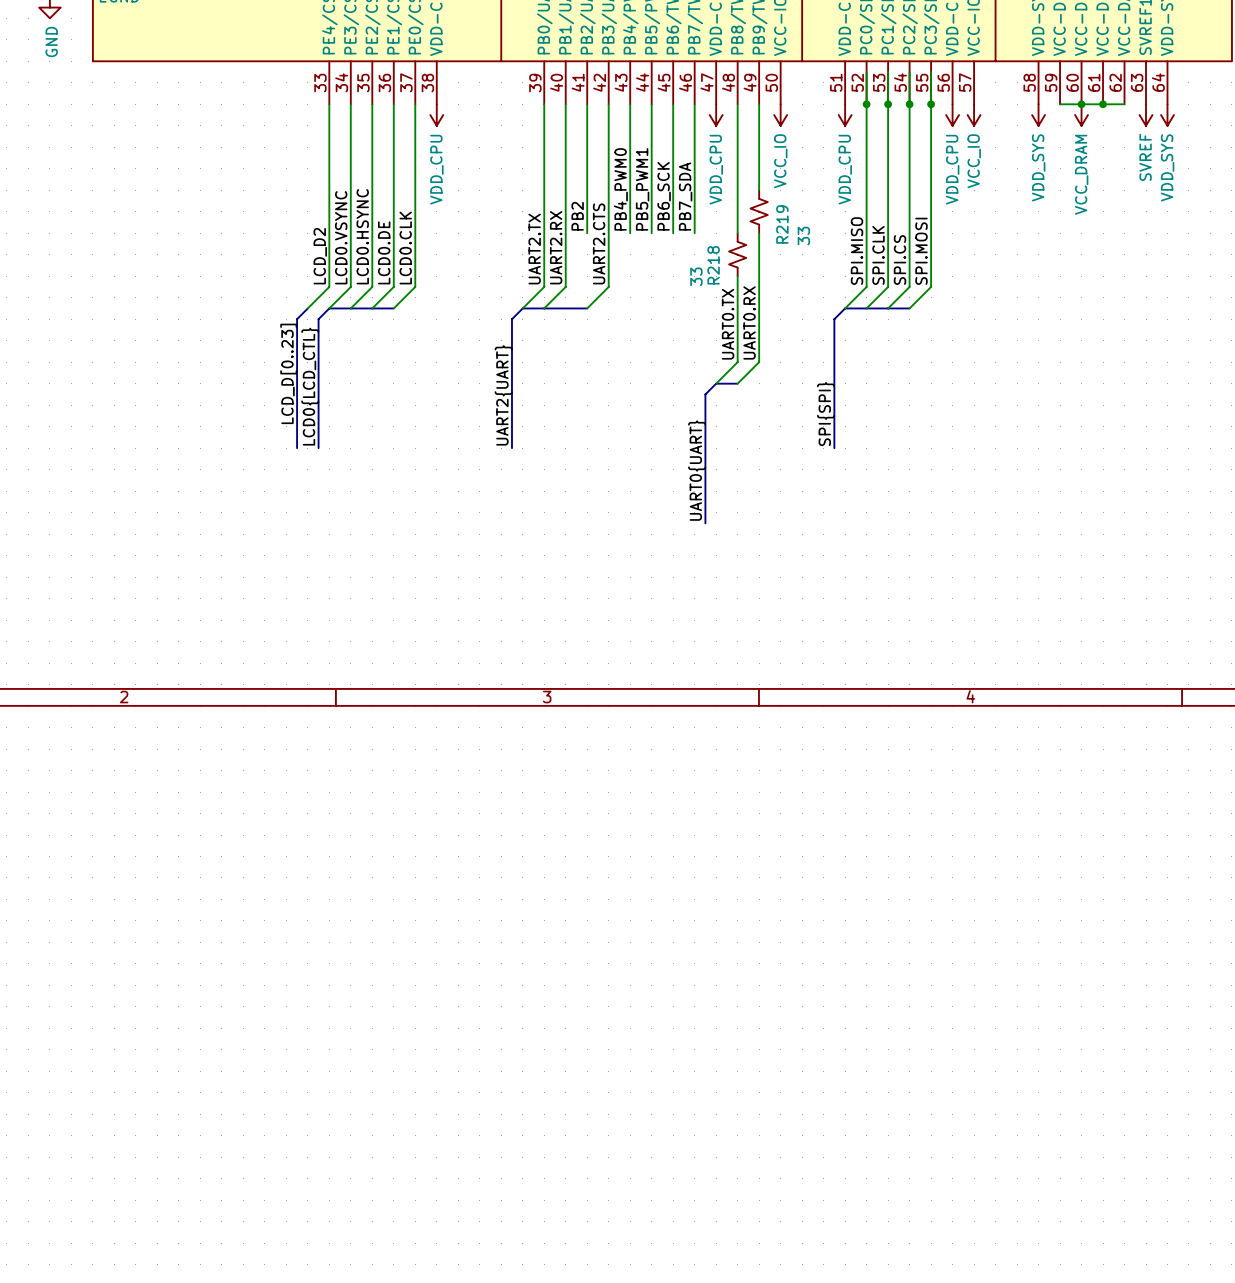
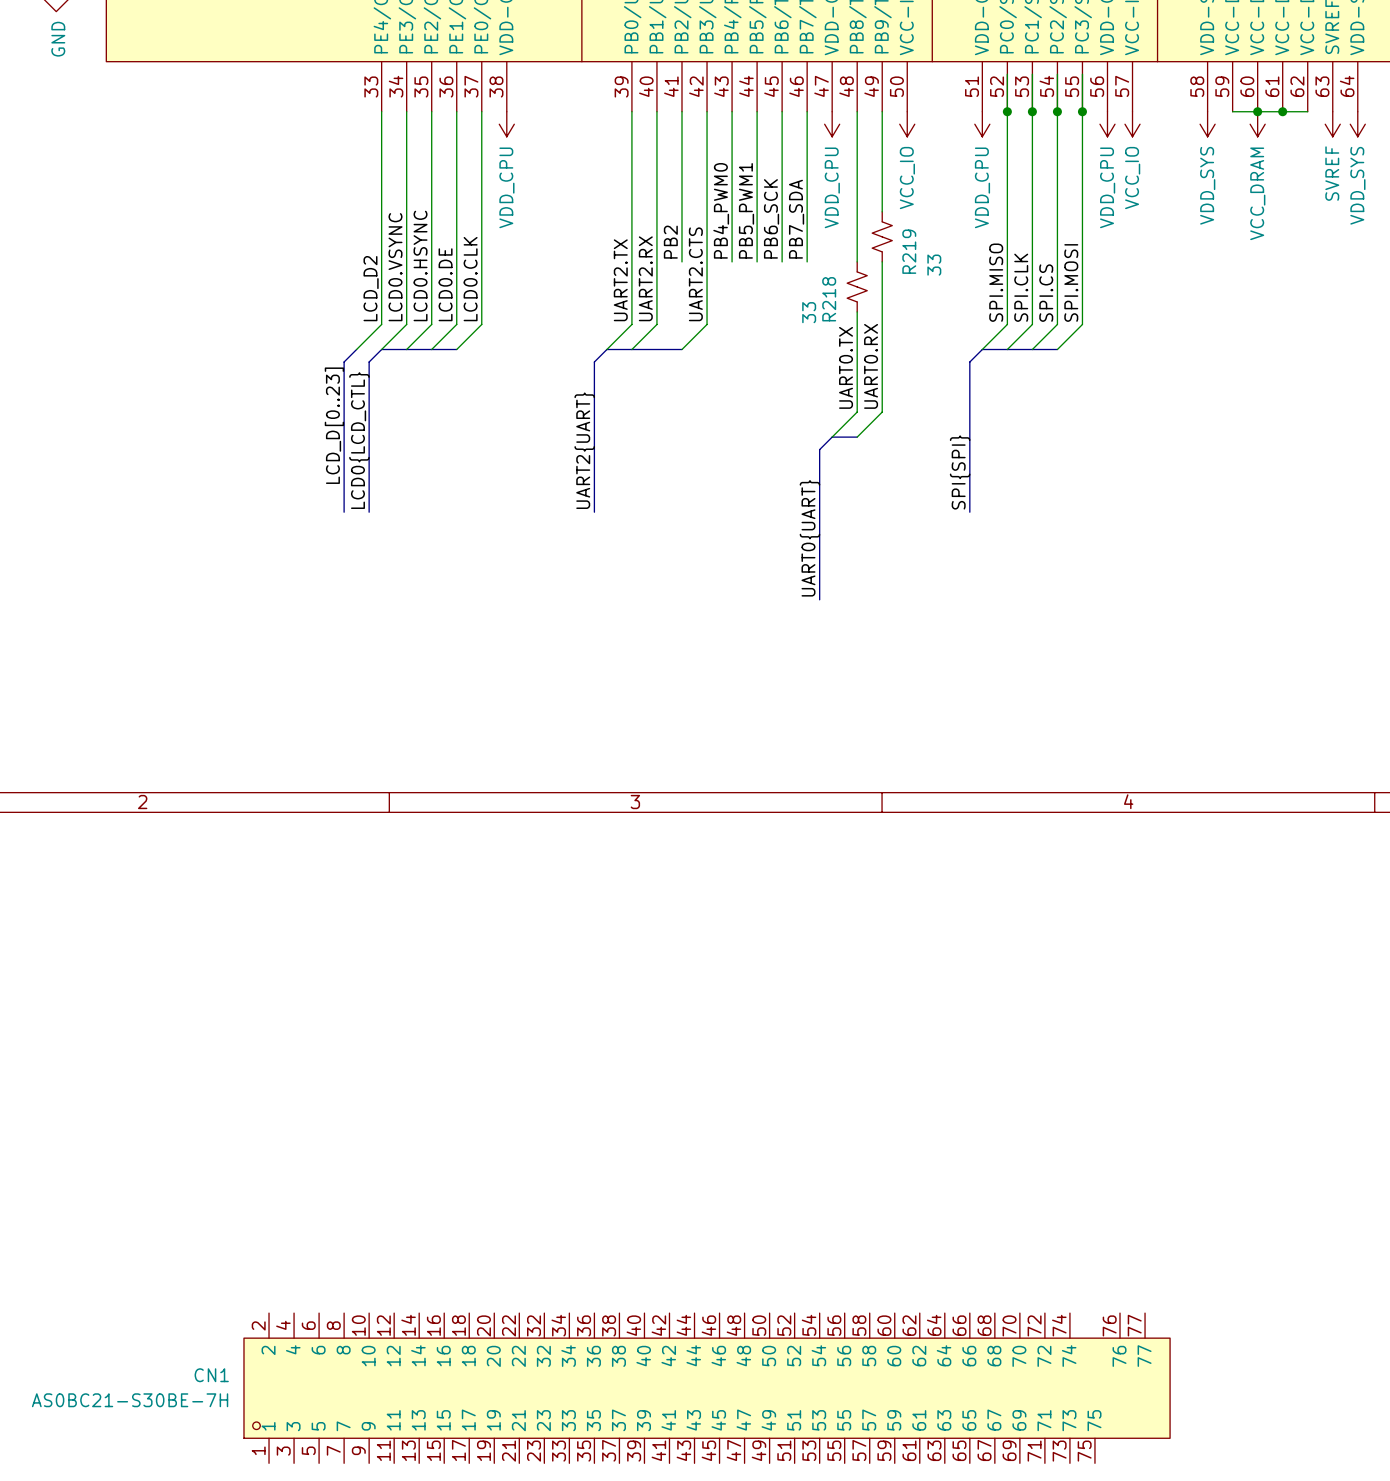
CN1: none -> AS0BC21-S30BE-7H (707, 1388)

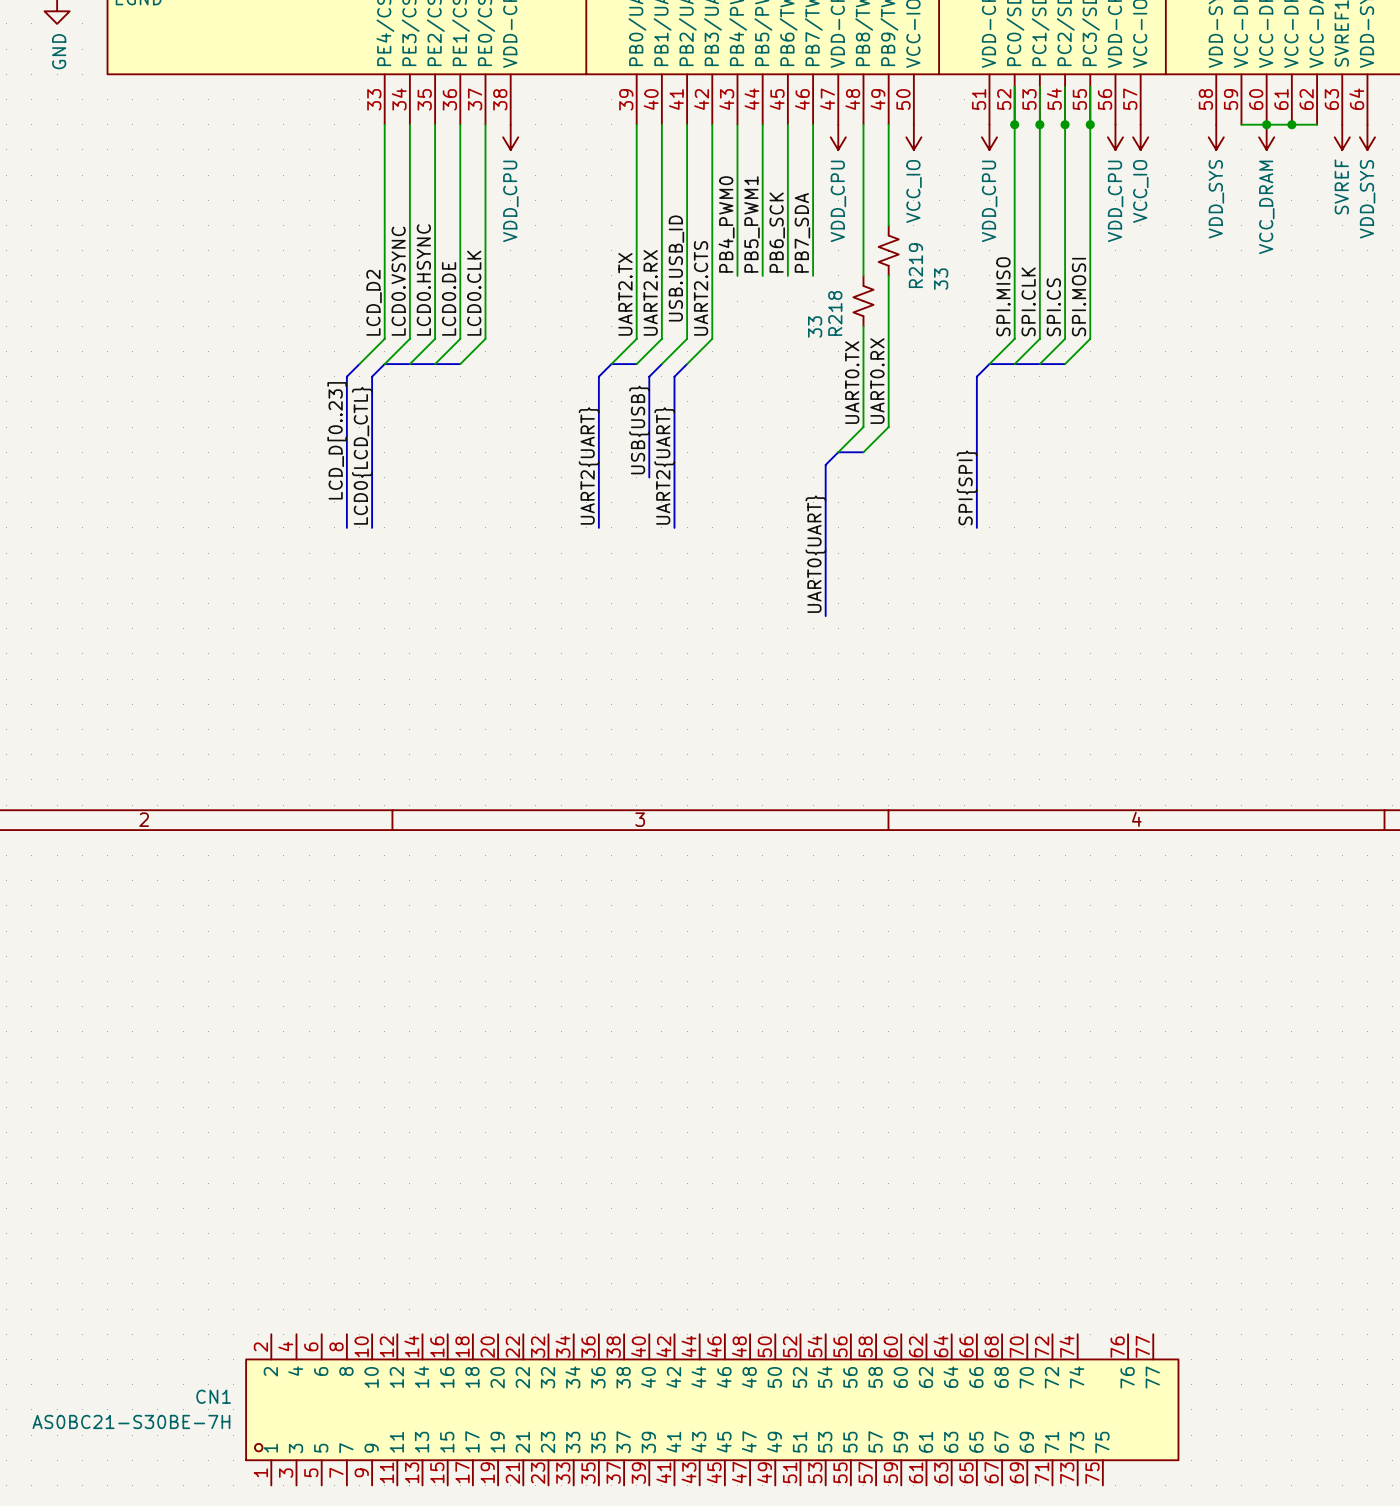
label: PB2 (670, 242) -> none
label: none -> USB.USB_ID (676, 268)
wire: none -> (687, 275) (687, 338) (661, 364)
bus: (631, 349) (681, 349) -> (674, 527) (674, 376) (687, 364)
bus: none -> (661, 364) (649, 376) (649, 477)
label: none -> USB{USB} (639, 429)
label: none -> UART2{UART} (664, 465)

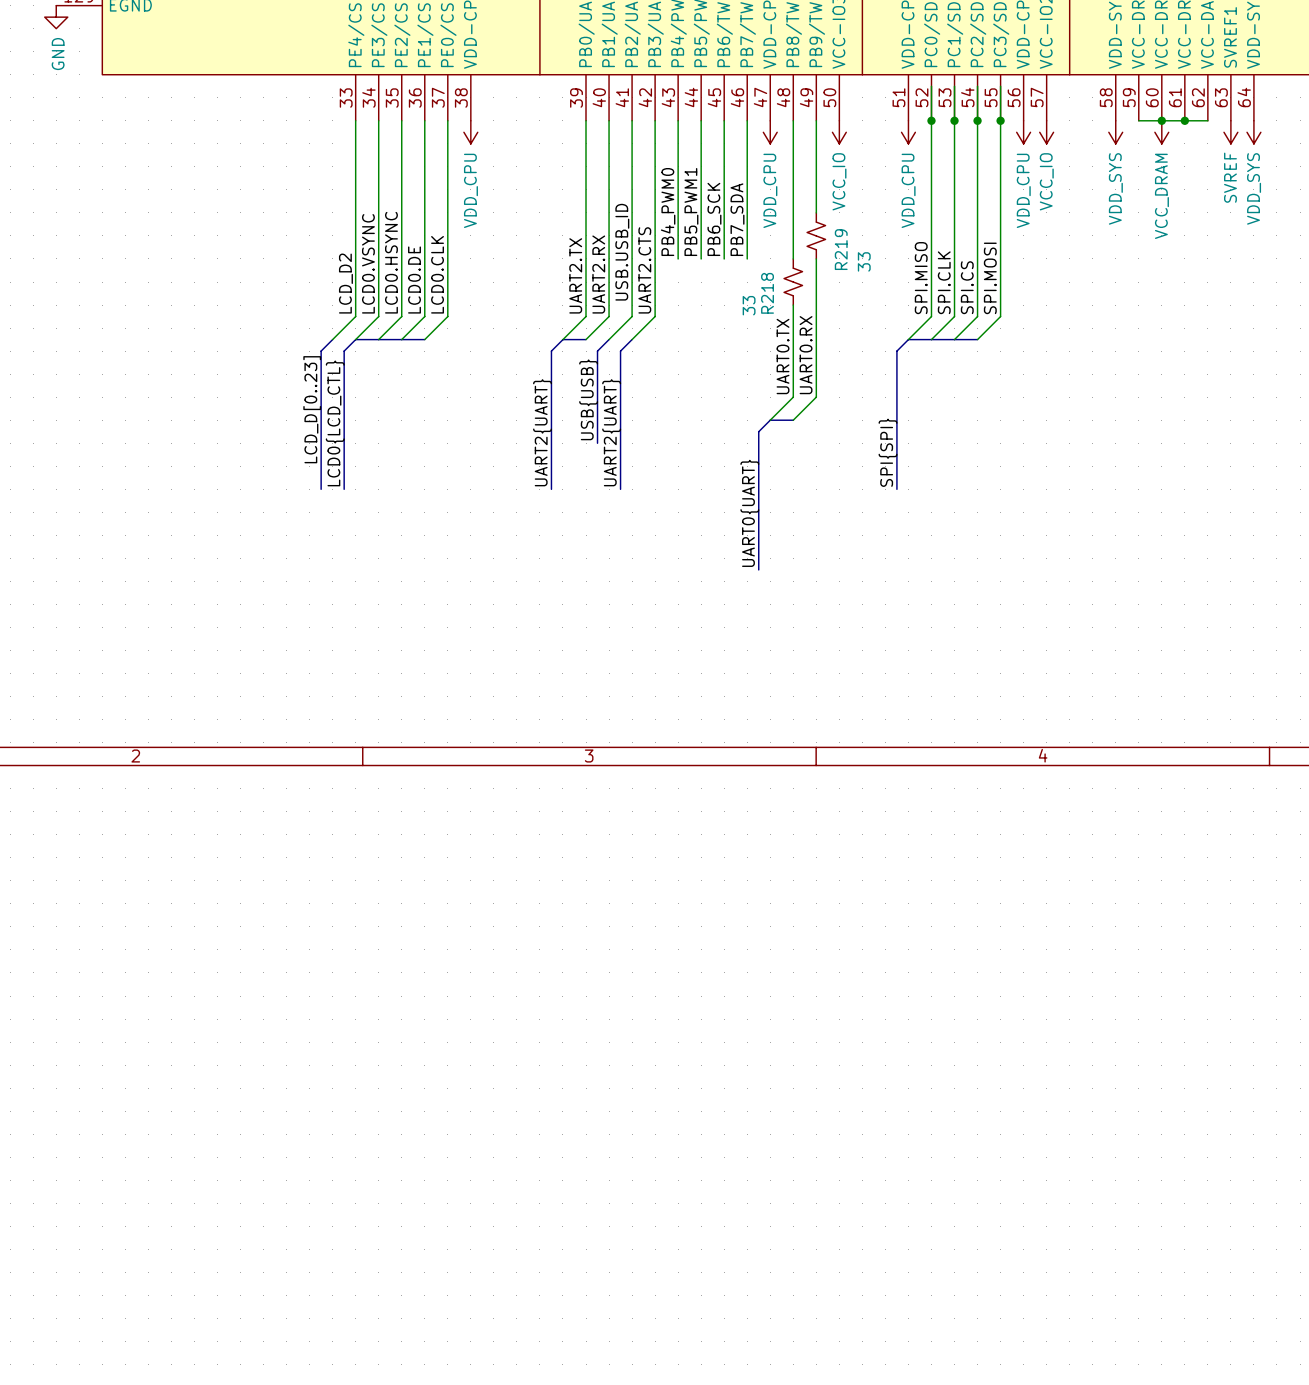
CN1: AS0BC21-S30BE-7H (712, 1409) -> none

